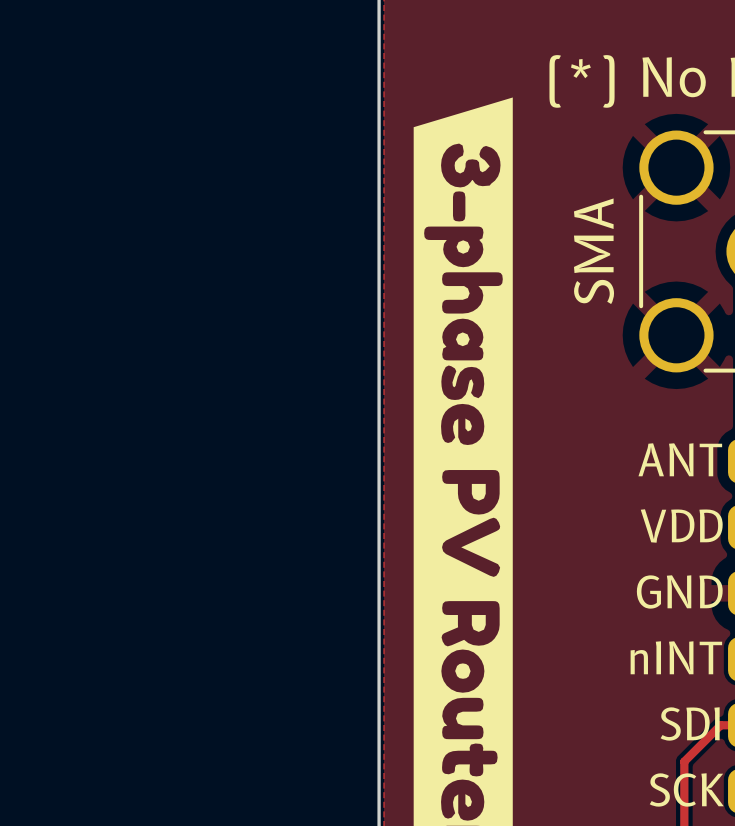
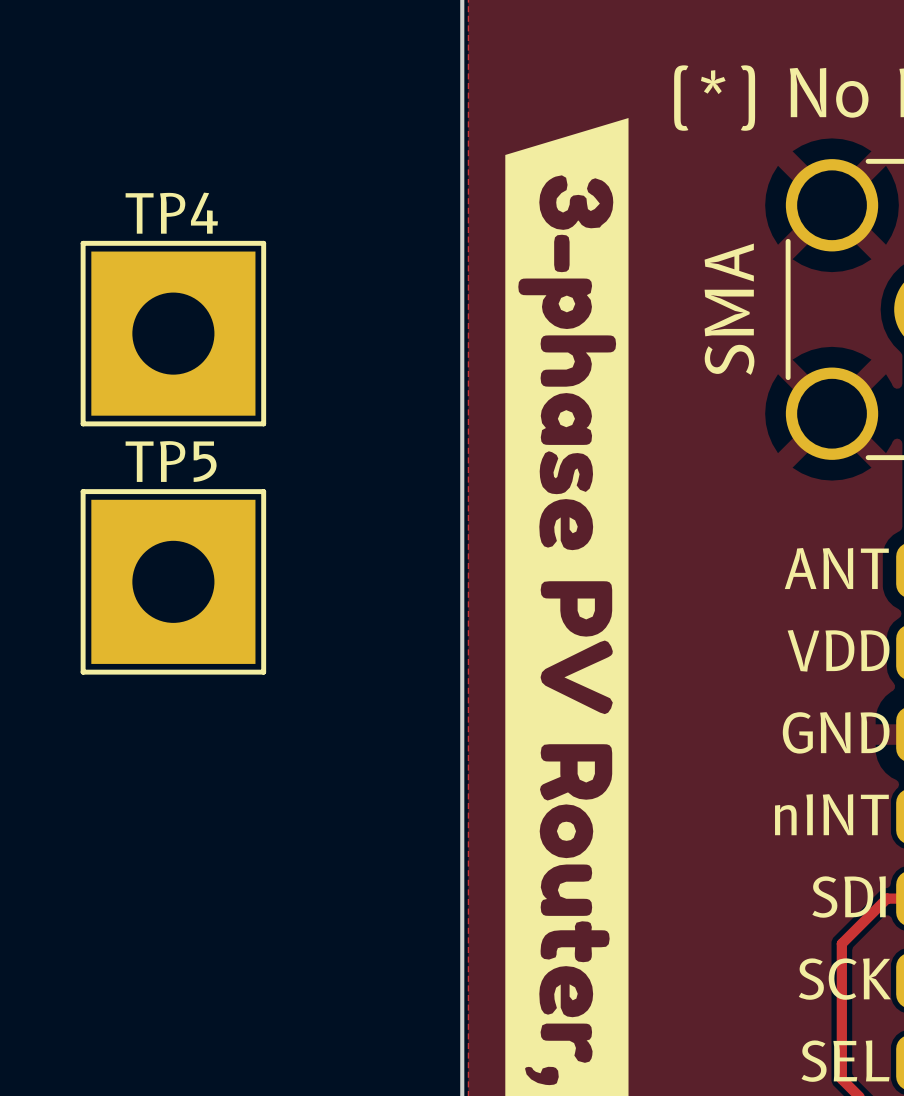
TP4: none -> (173, 333)
TP5: none -> (173, 581)

